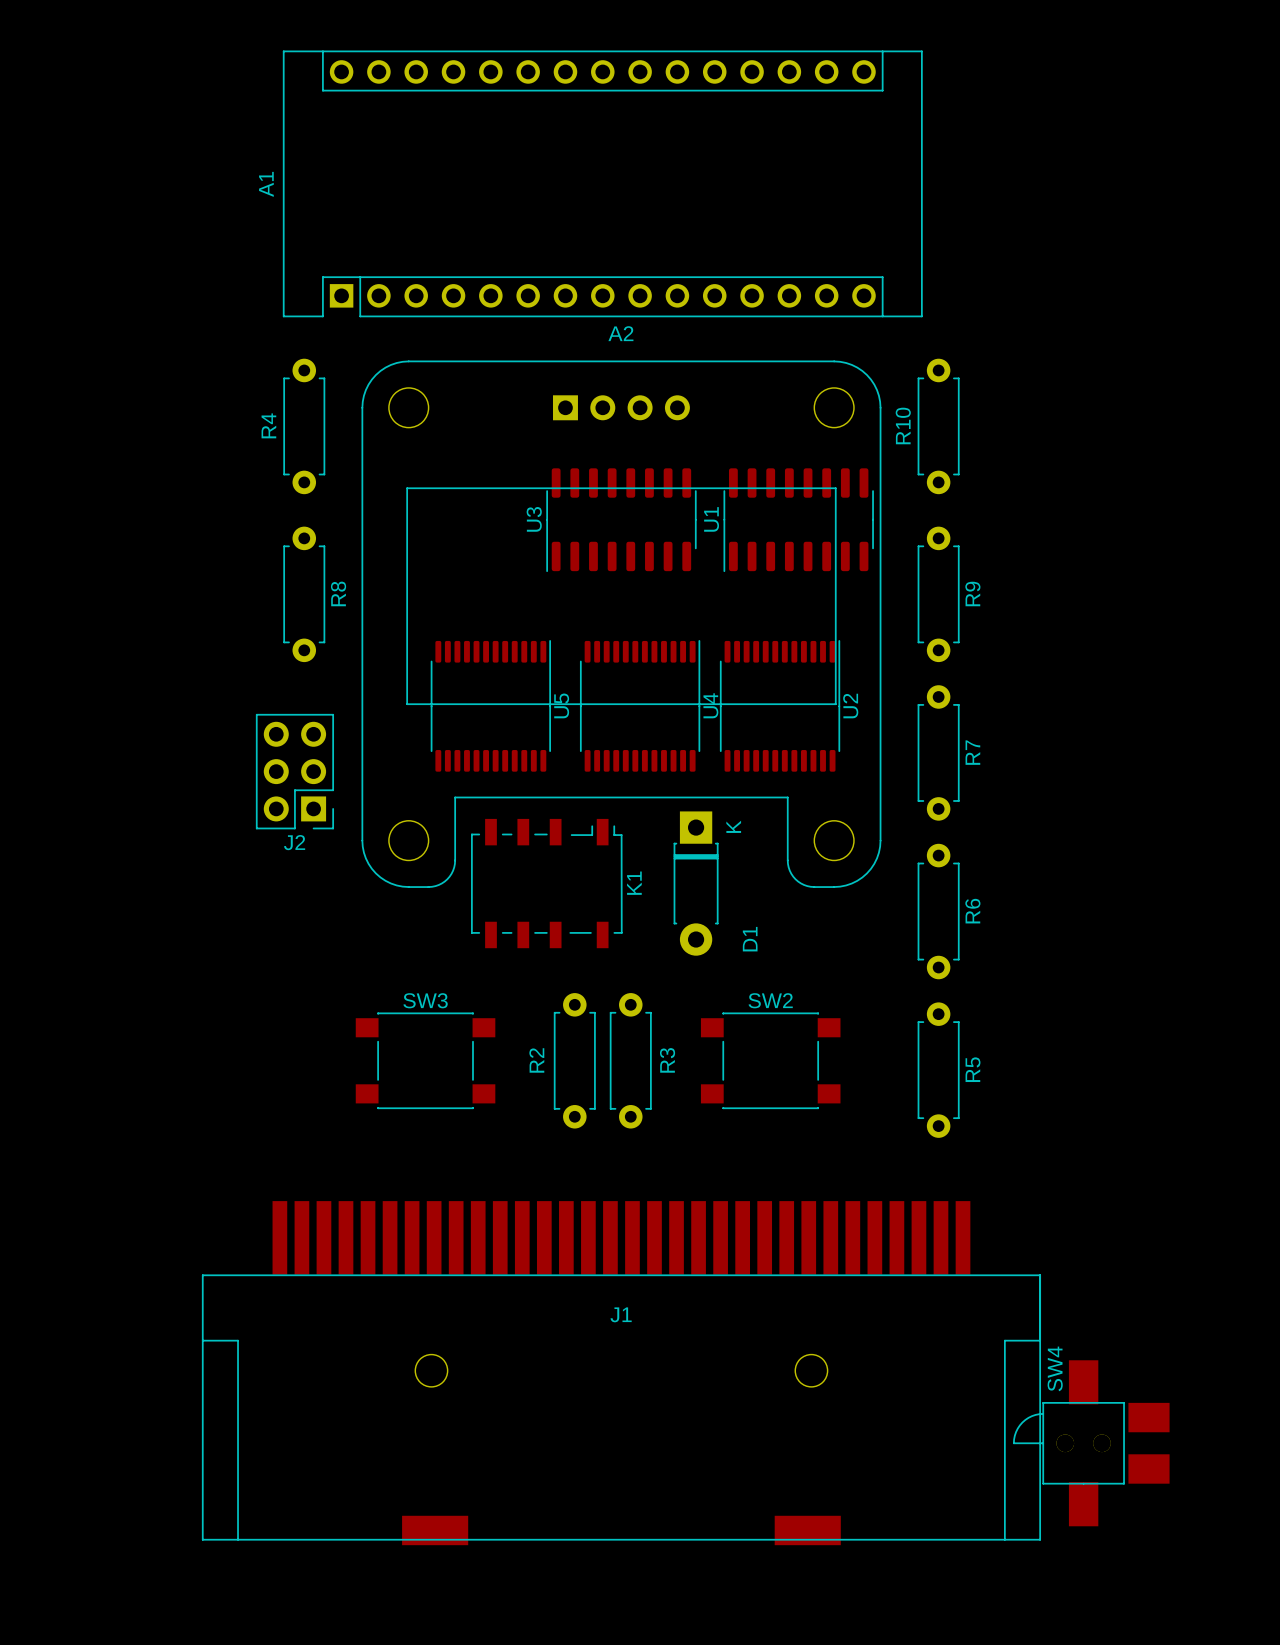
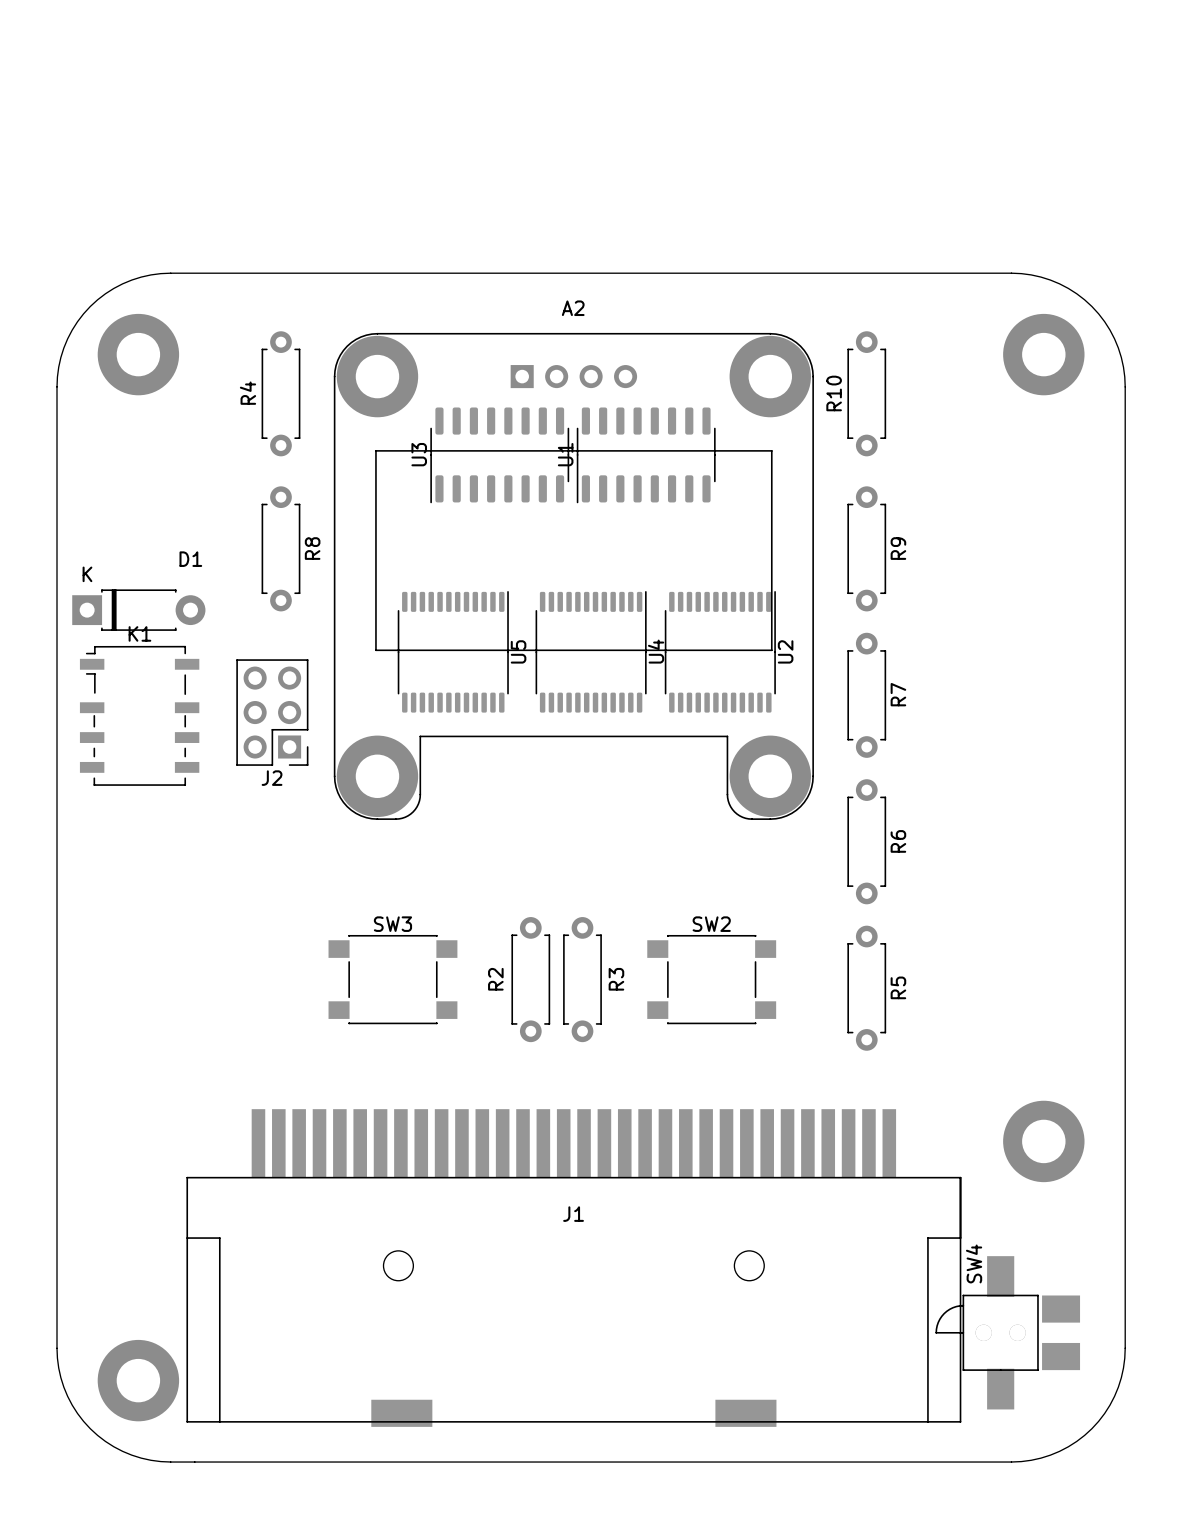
A1: (602, 183) -> none
board edge: none -> (170, 273) (1021, 273) (1050, 280) (1068, 288) (1084, 299) (1098, 313) (1109, 330) (1118, 348) (1123, 367) (1125, 386) (1125, 1348) (1123, 1368) (1114, 1396) (1098, 1421) (1084, 1435) (1068, 1446) (1050, 1455) (1031, 1460) (1011, 1462) (170, 1462) (150, 1460) (122, 1451) (97, 1435) (83, 1421) (72, 1405) (63, 1387) (58, 1368) (57, 1348) (57, 377) (60, 357) (67, 338) (77, 321) (90, 306) (113, 288) (131, 280) (150, 274) (170, 273)
A2 footprint: [361, 360, 882, 888] -> [333, 332, 814, 820]
part: none -> (138, 354)
part: none -> (1043, 354)
U3 position: (621, 520) -> (499, 455)
U1 position: (798, 520) -> (646, 455)
K1 rotation: 0° (546, 883) -> 90° counterclockwise (139, 715)
K1 position: (546, 883) -> (139, 715)
D1 rotation: 0° (696, 883) -> 90° counterclockwise (138, 610)
D1 position: (696, 883) -> (138, 610)
part: none -> (1043, 1141)
part: none -> (138, 1380)

